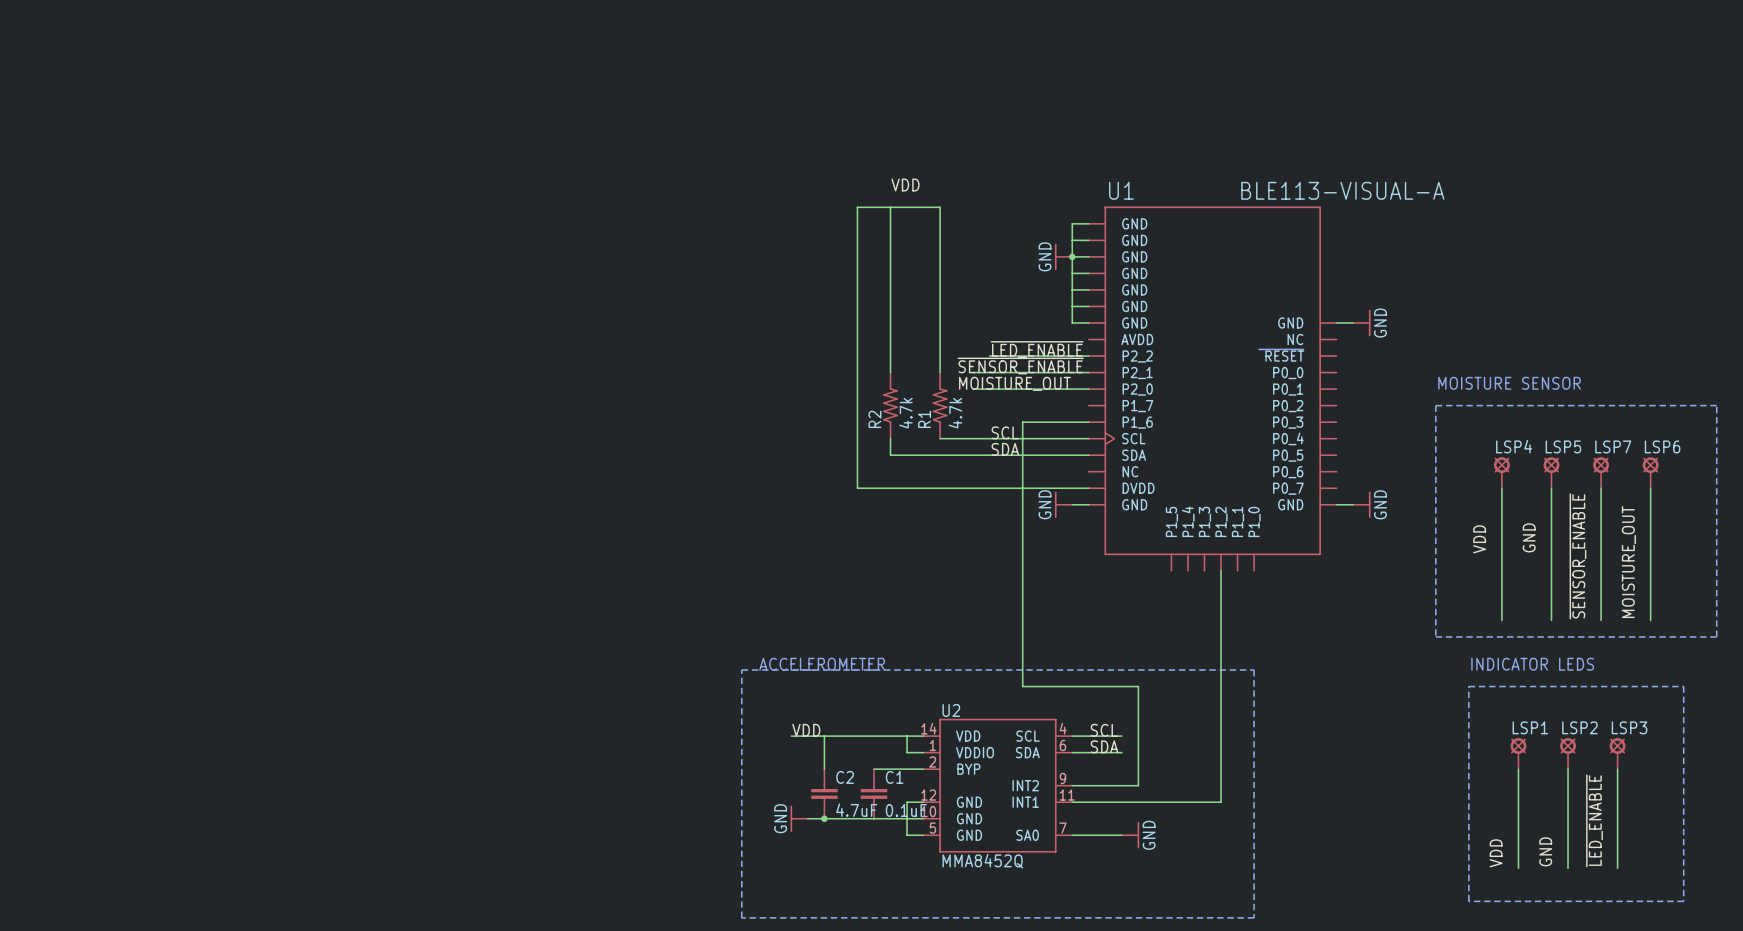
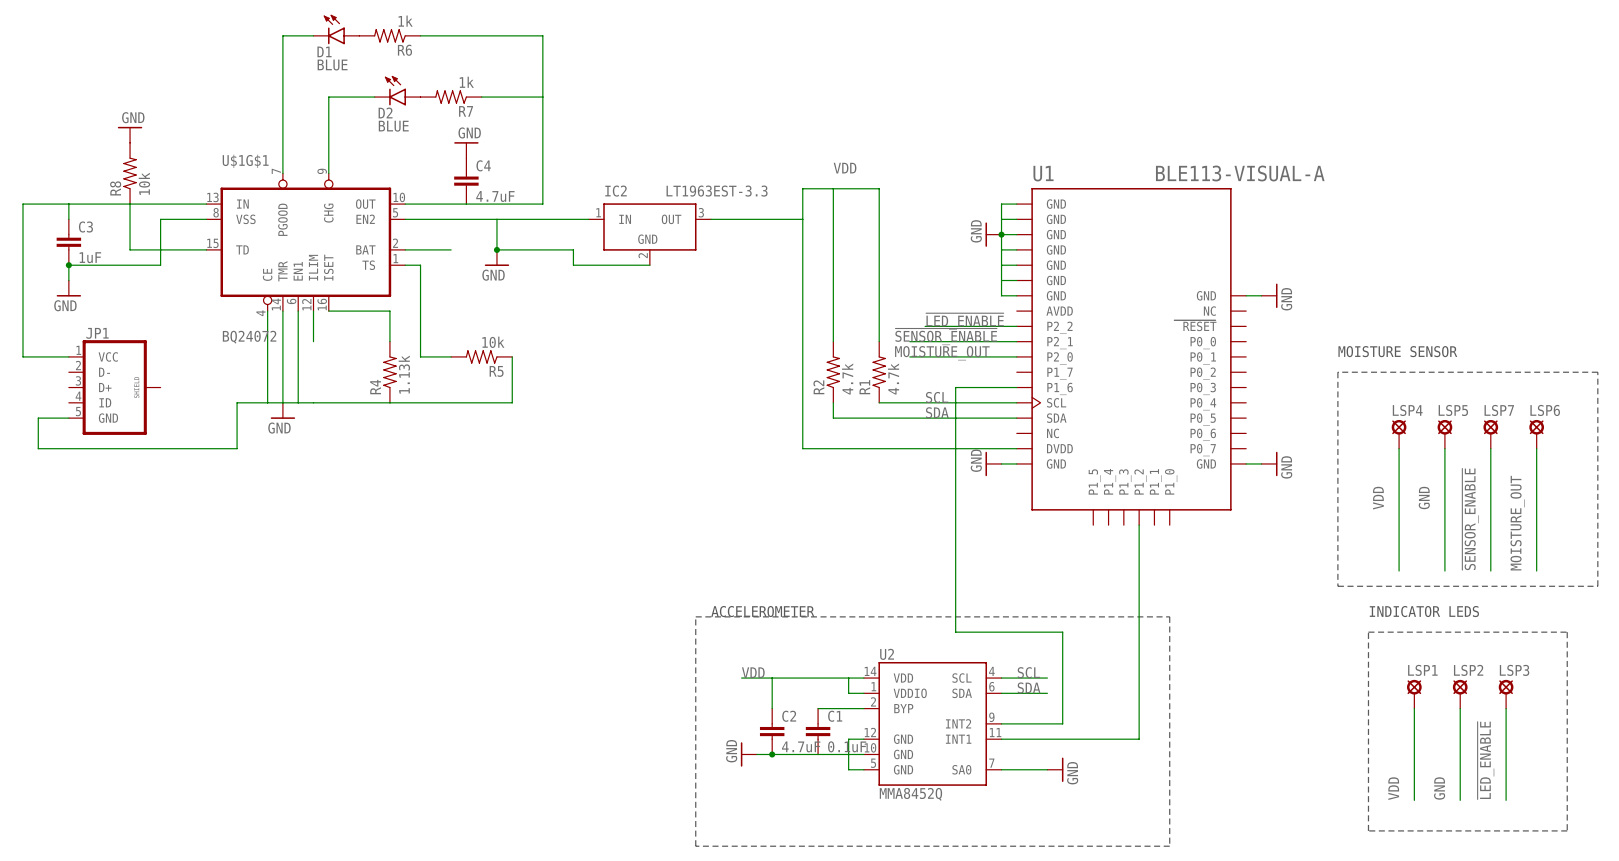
D1: none -> BLUE (336, 29)
wire: none -> (313, 35) (282, 35) (282, 173)
R6: none -> 1k (389, 35)
wire: none -> (420, 35) (542, 35) (542, 204) (405, 204)
D2: none -> BLUE (397, 90)
wire: none -> (374, 97) (328, 97) (328, 173)
R7: none -> 1k (451, 97)
wire: none -> (481, 97) (542, 97)
power symbol: none -> GND (130, 134)
power symbol: none -> GND (466, 150)
R8: none -> 10k (130, 173)
C4: none -> 4.7uF (466, 181)
wire: none -> (68, 204) (68, 219)
wire: none -> (130, 204) (130, 249) (206, 249)
wire: none -> (206, 204) (23, 204) (23, 356) (68, 356)
wire: none -> (206, 219) (160, 219) (160, 265) (68, 265) (68, 280)
wire: none -> (405, 219) (588, 219)
wire: none -> (496, 219) (496, 249) (573, 249) (573, 265) (649, 265)
wire: none -> (711, 219) (802, 219)
IC2: none -> LT1963EST-3.3 (649, 234)
C3: none -> 1uF (68, 242)
U$1G$1: none -> BQ24072 (305, 242)
wire: none -> (405, 249) (451, 249)
junction: none -> (496, 249)
power symbol: none -> GND (496, 257)
junction: none -> (68, 265)
wire: none -> (405, 265) (420, 265) (420, 356) (451, 356)
power symbol: none -> GND (68, 288)
wire: none -> (267, 311) (267, 402)
wire: none -> (282, 311) (282, 402)
wire: none -> (298, 311) (298, 402)
wire: none -> (313, 311) (313, 341)
wire: none -> (328, 311) (389, 311) (389, 341)
R5: none -> 10k (481, 356)
wire: none -> (512, 356) (512, 402) (237, 402) (237, 448) (38, 448) (38, 418) (68, 418)
R4: none -> 1.13k (389, 372)
JP1: none -> (114, 387)
power symbol: none -> GND (282, 410)

